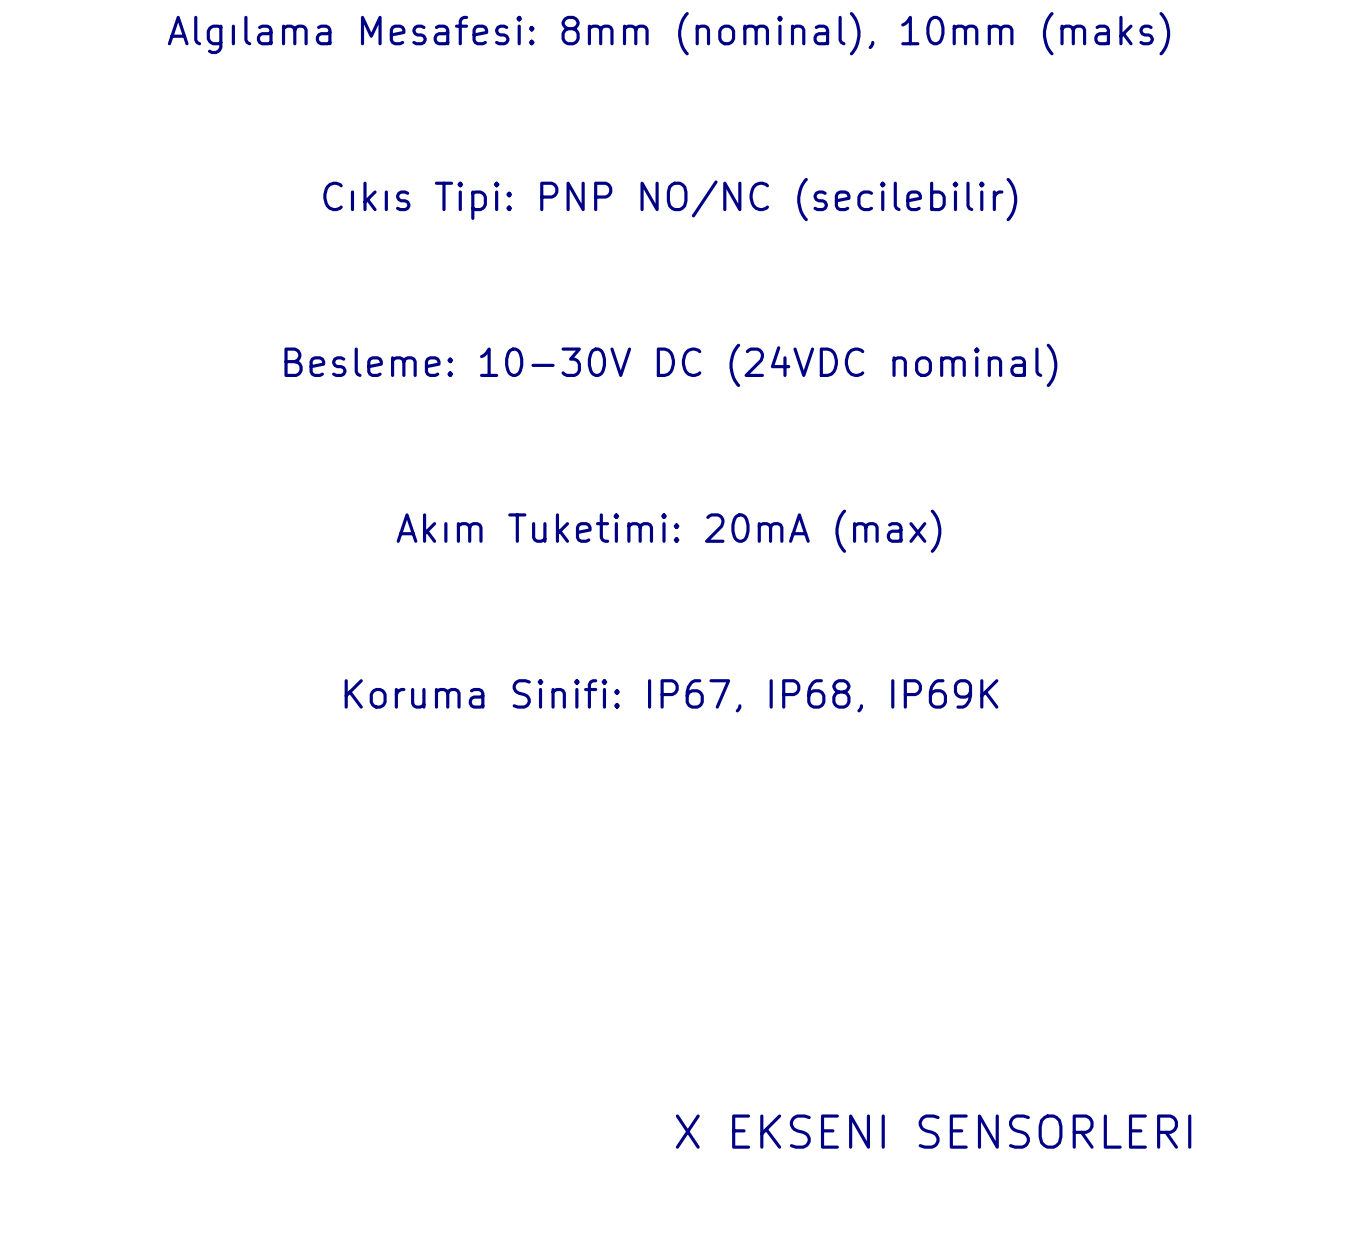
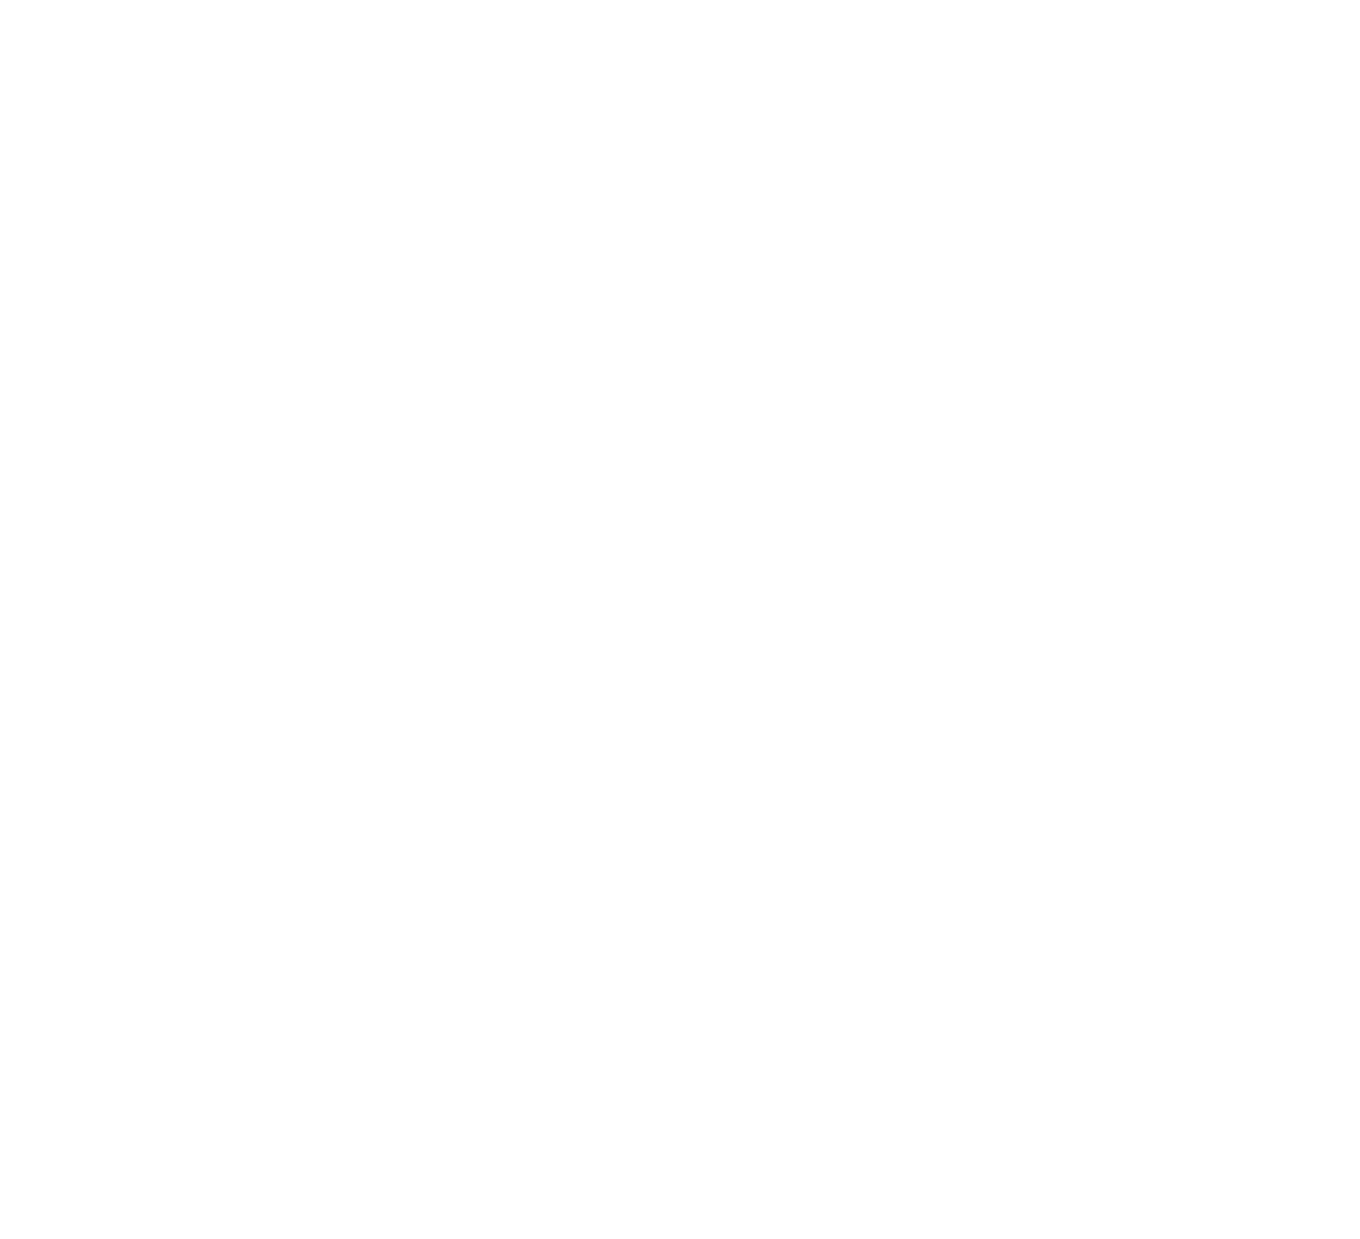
text: Algılama Mesafesi: 8mm (nominal), 10mm (maks) (669, 33) -> none
text: Cıkıs Tipi: PNP NO/NC (secilebilir) (670, 199) -> none
text: Besleme: 10-30V DC (24VDC nominal) (670, 365) -> none
text: Akım Tuketimi: 20mA (max) (669, 531) -> none
text: Koruma Sinifi: IP67, IP68, IP69K (671, 695) -> none
text: X EKSENI SENSORLERI (933, 1131) -> none

